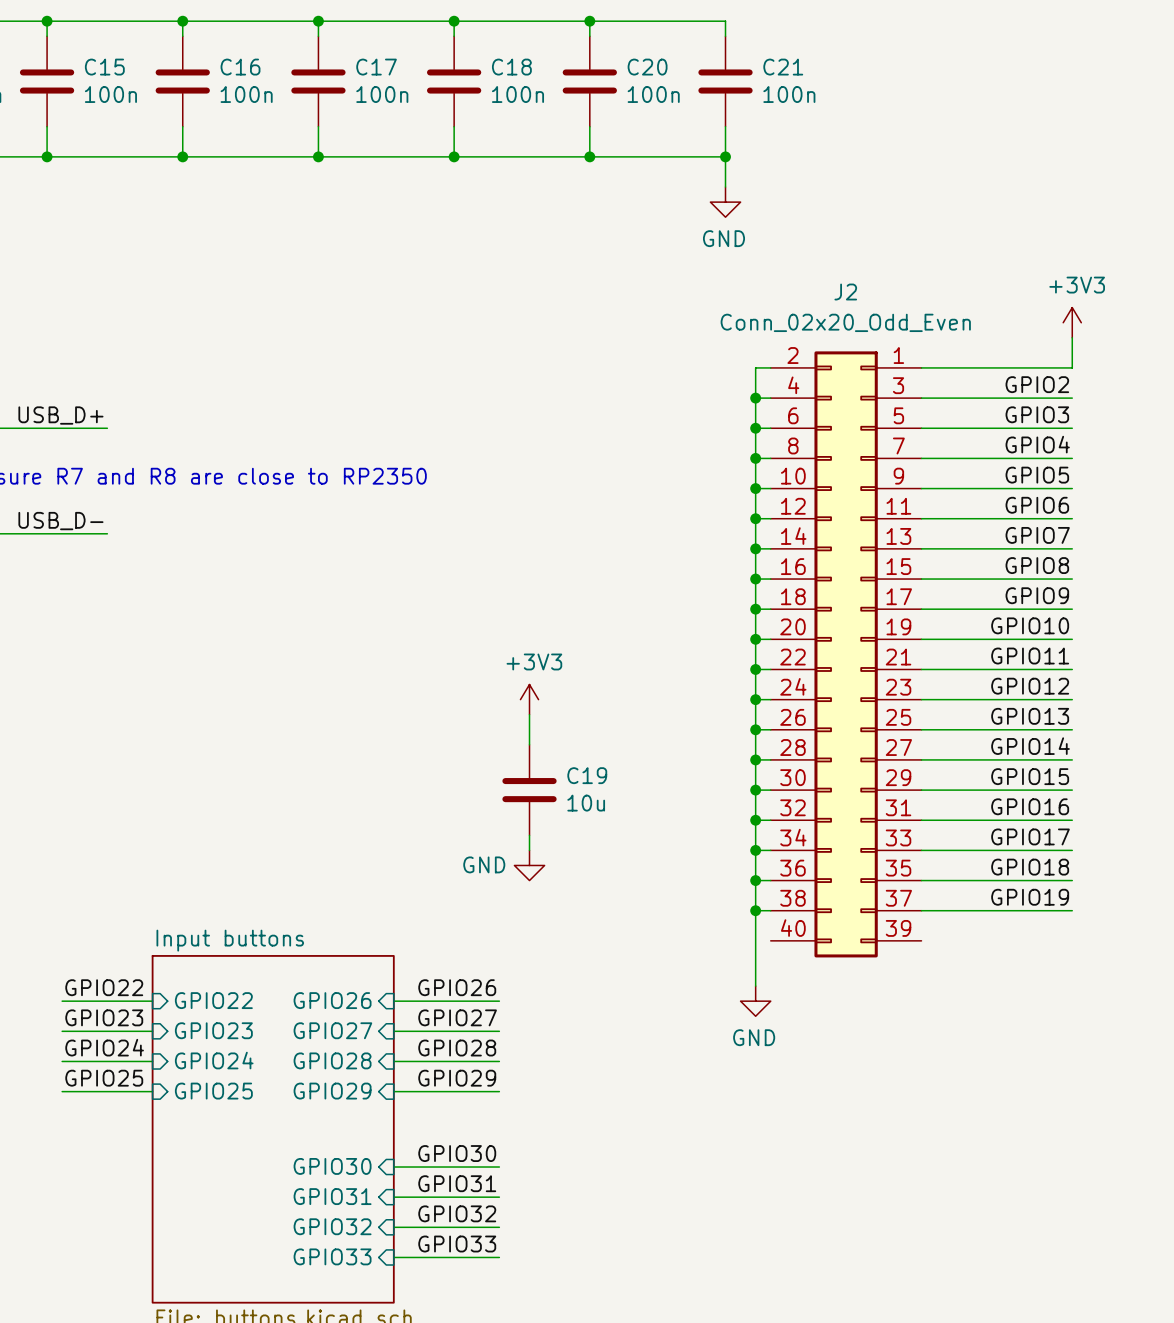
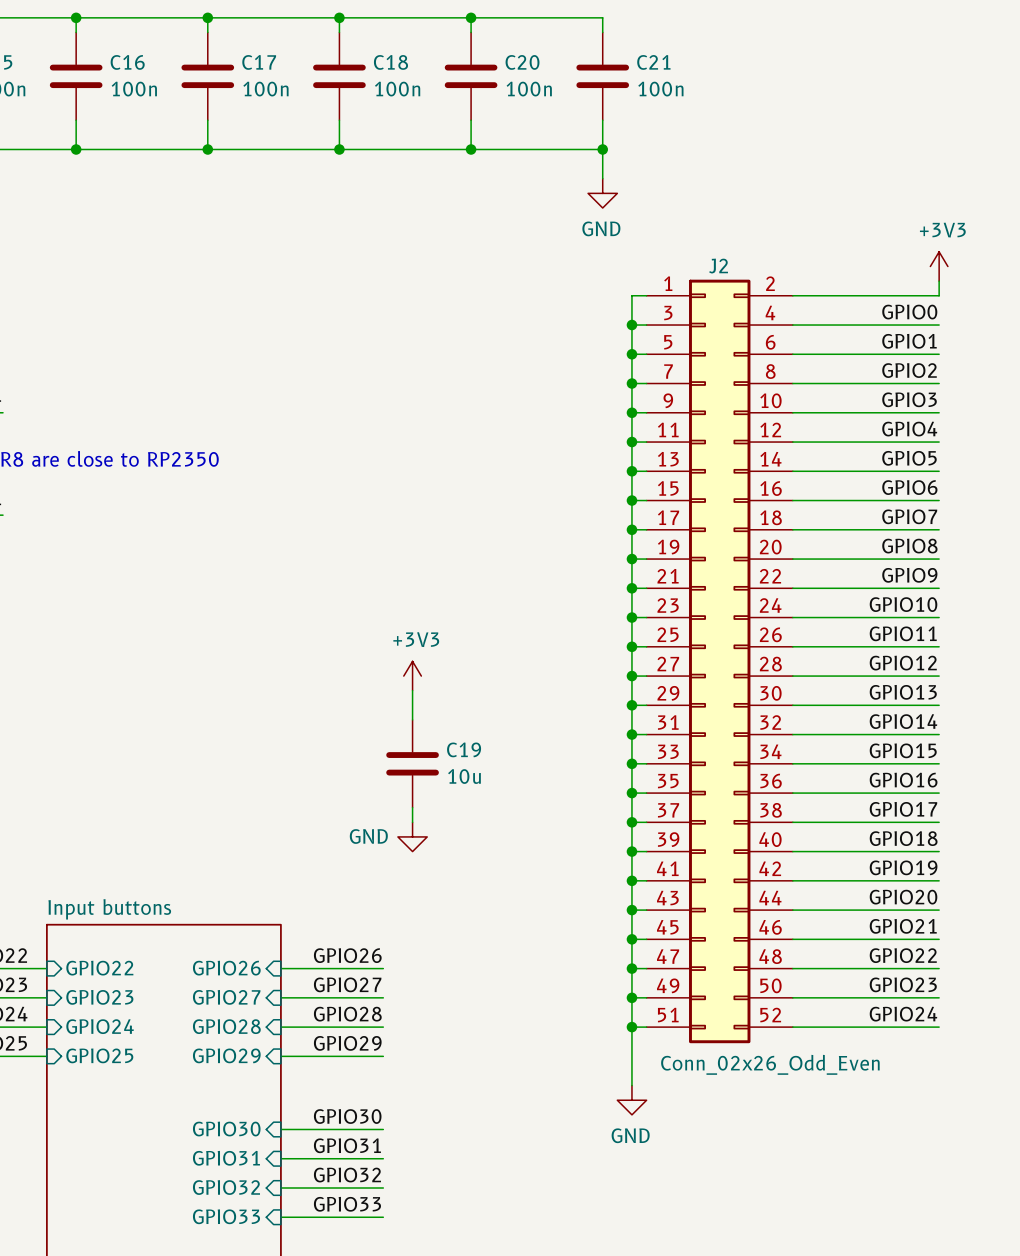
J2 name position: J2 (845, 292) -> J2 (718, 266)
wire: none -> (939, 281) (939, 295) (792, 295)
wire: none -> (646, 295) (631, 295) (631, 354)
J2 value: Conn_02x20_Odd_Even (845, 322) -> Conn_02x26_Odd_Even (770, 1064)
power symbol position: +3V3 (1072, 322) -> +3V3 (939, 266)
label: none -> GPIO0 (909, 312)
wire: none -> (631, 325) (646, 325)
junction: none -> (631, 325)
wire: (1072, 337) (1072, 367) -> (939, 325) (792, 325)
J2 symbol: [770, 351, 922, 958] -> [646, 279, 793, 1044]
label: none -> GPIO1 (909, 341)
junction: none -> (631, 354)
label: none -> GPIO20 (903, 897)
wire: none -> (631, 910) (646, 910)
junction: none -> (631, 910)
wire: none -> (792, 910) (939, 910)
label: none -> GPIO21 (903, 926)
wire: none -> (631, 939) (646, 939)
junction: none -> (631, 939)
wire: none -> (792, 939) (939, 939)
wire: none -> (631, 953) (631, 1085)
label: none -> GPIO22 (903, 955)
power symbol position: GND (755, 1001) -> GND (631, 1100)
junction: none -> (631, 968)
wire: none -> (792, 968) (939, 968)
label: none -> GPIO23 (903, 984)
junction: none -> (631, 997)
wire: none -> (792, 997) (939, 997)
label: none -> GPIO24 (903, 1014)
wire: none -> (631, 1027) (646, 1027)
junction: none -> (631, 1027)
wire: none -> (792, 1027) (939, 1027)

